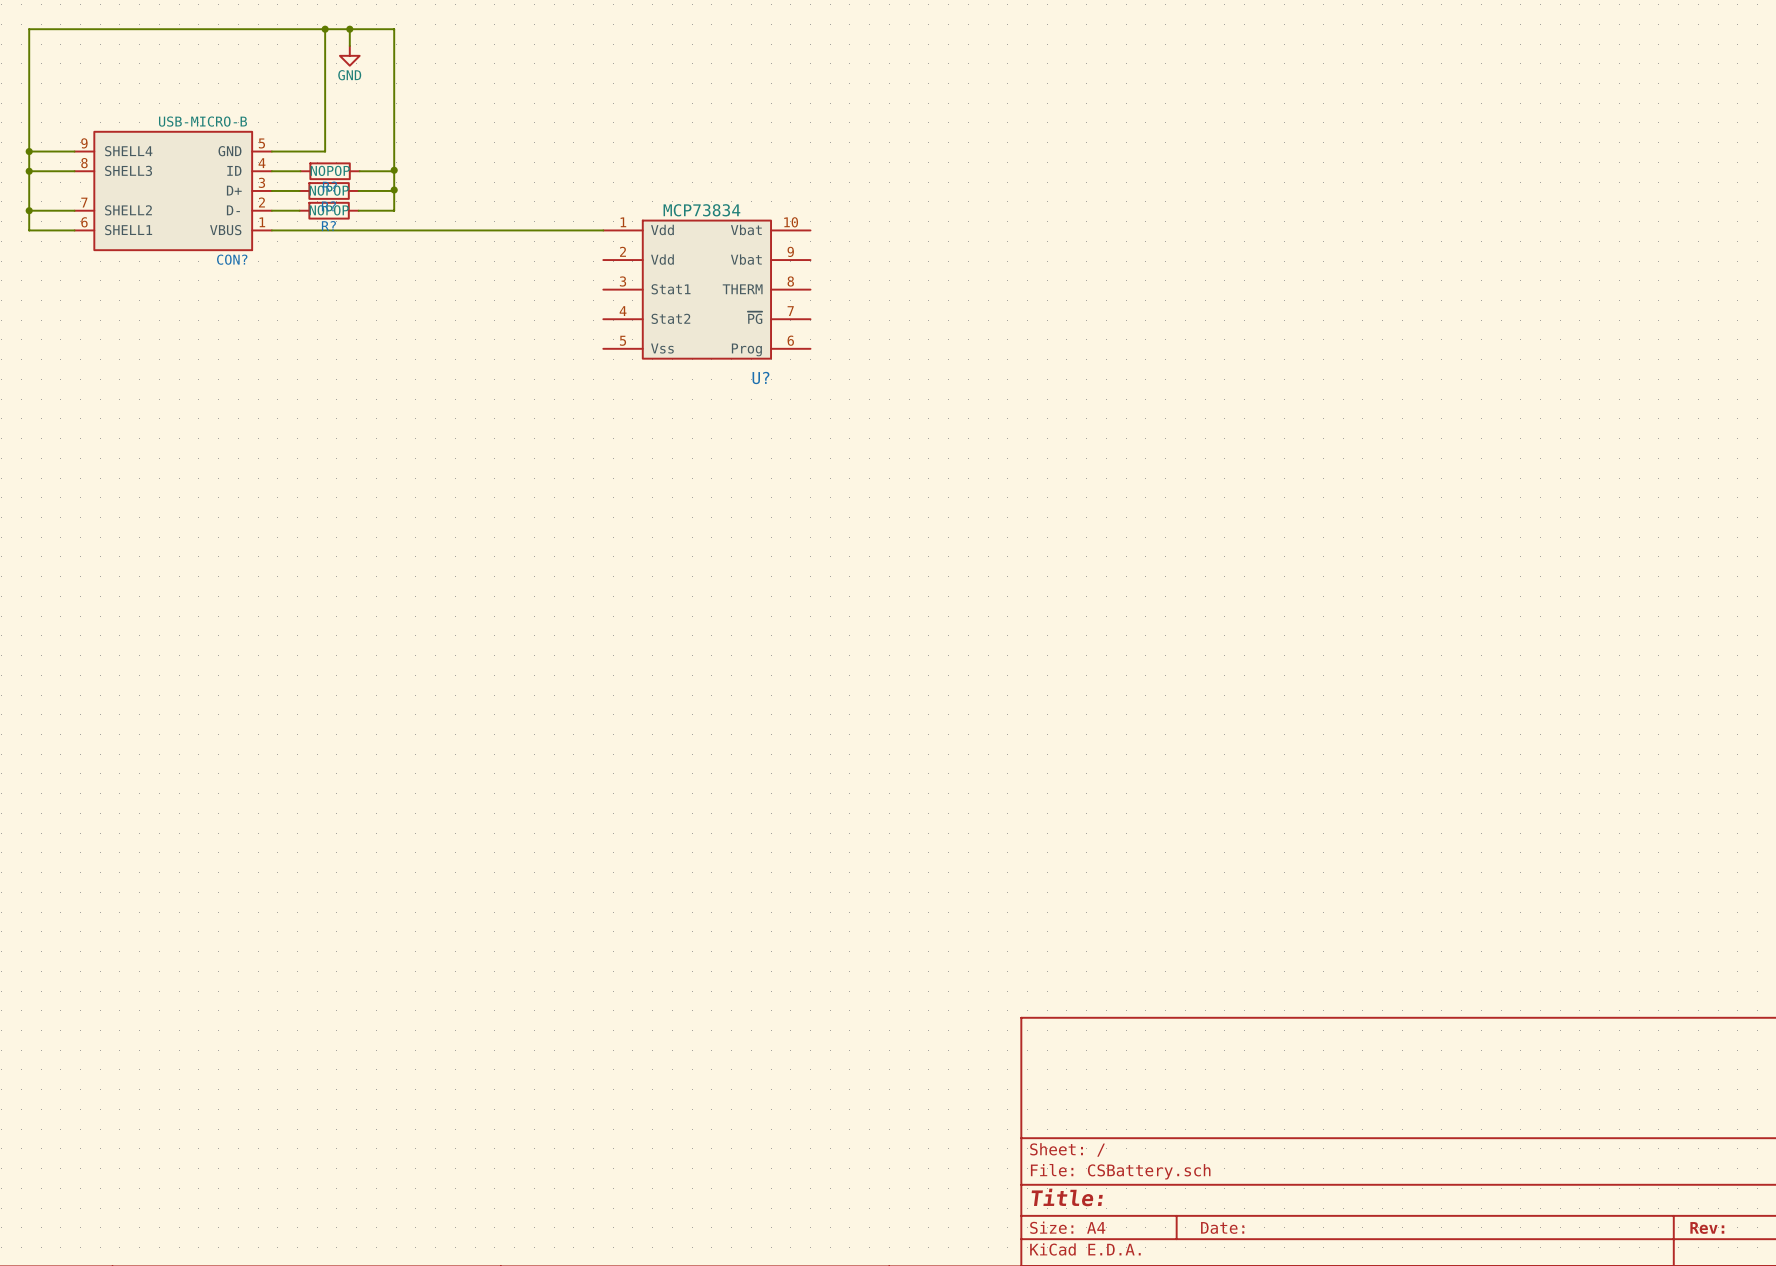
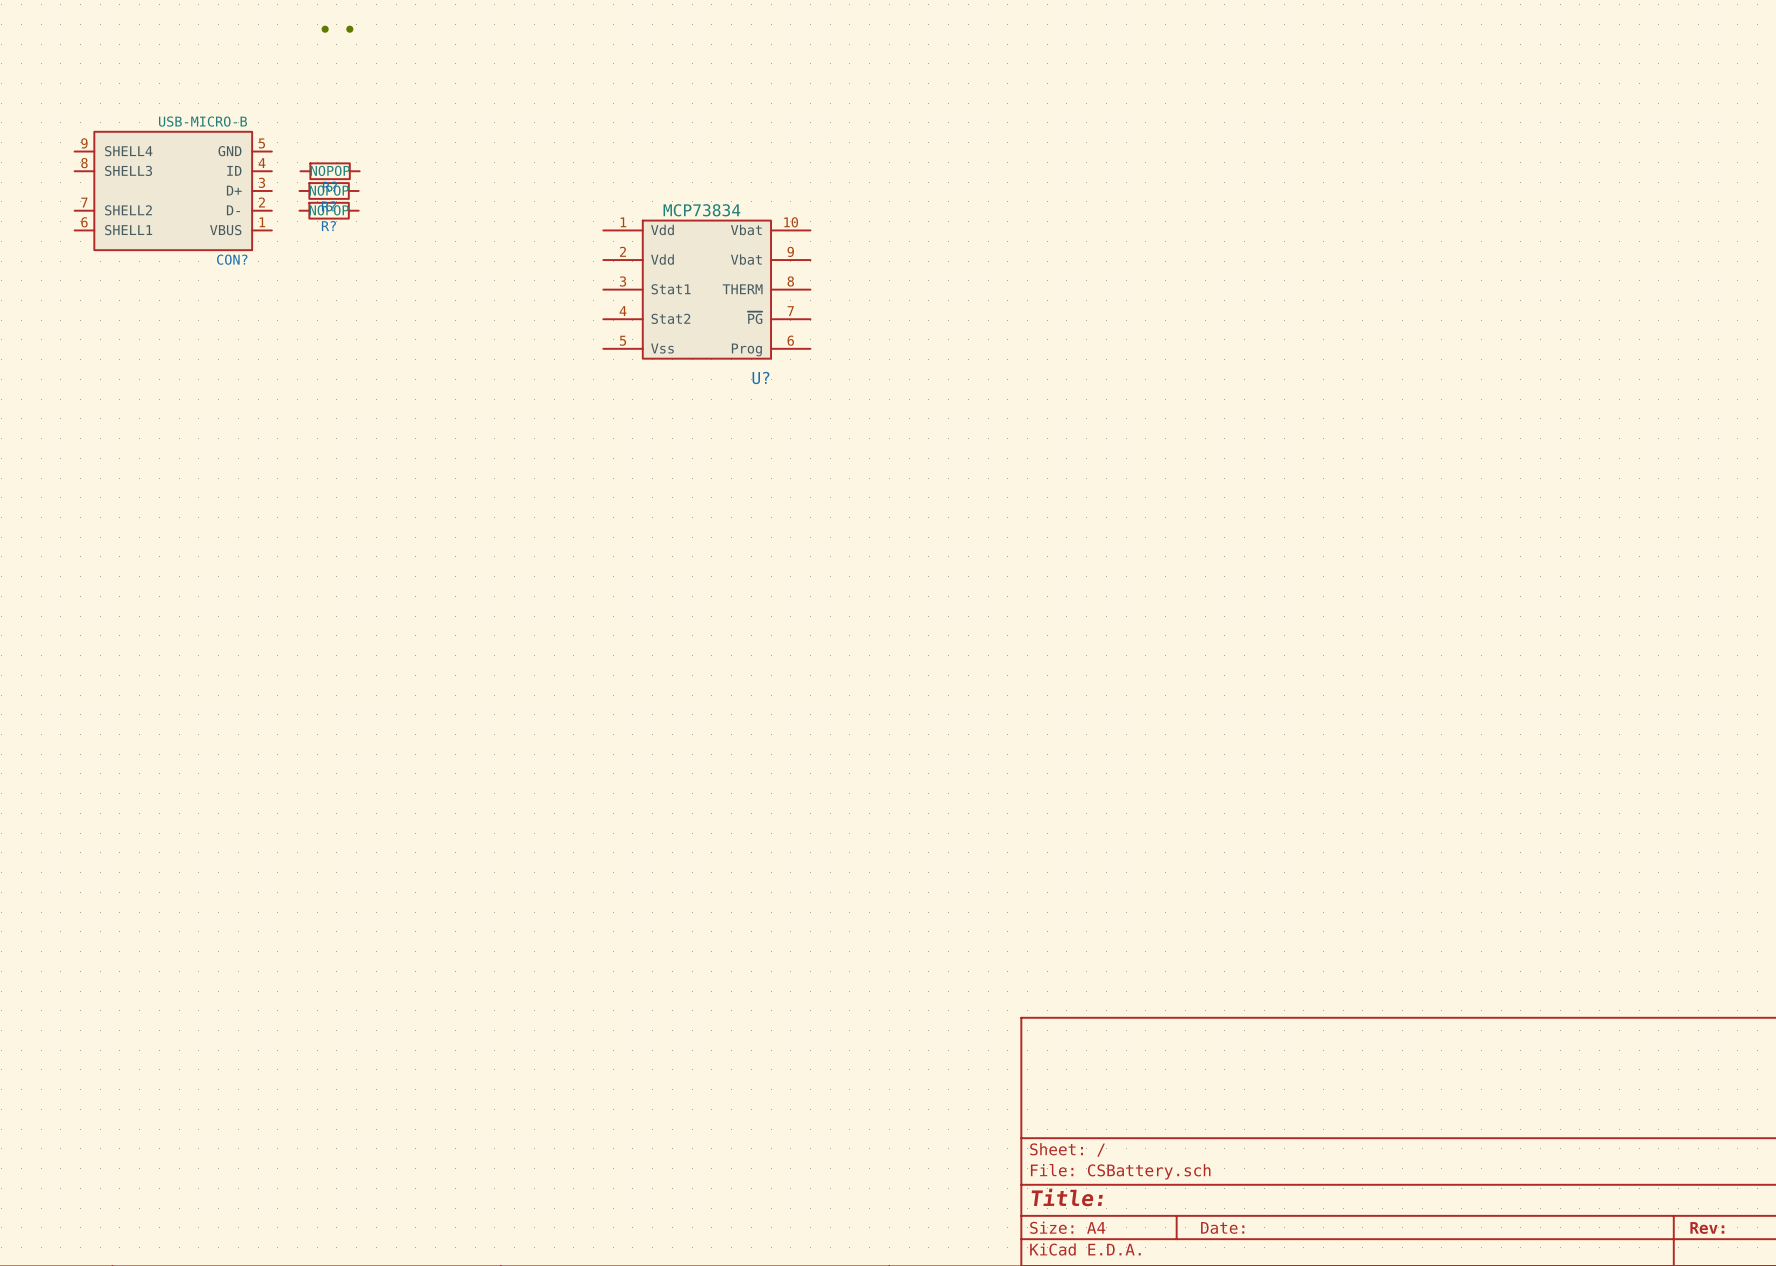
wire: (325, 29) (325, 151) (271, 151) -> none
wire: (349, 29) (349, 45) -> none
power symbol: GND (349, 55) -> none
wire: (29, 151) (74, 151) -> none
junction: (29, 151) -> none
junction: (394, 170) -> none
wire: (29, 171) (74, 171) -> none
junction: (29, 171) -> none
wire: (271, 171) (300, 171) -> none
wire: (359, 171) (394, 171) -> none
wire: (271, 190) (299, 190) -> none
wire: (358, 190) (394, 190) -> none
junction: (394, 190) -> none
wire: (29, 210) (74, 210) -> none
junction: (29, 210) -> none
wire: (271, 210) (299, 210) -> none
wire: (358, 210) (394, 210) (394, 29) (29, 29) (29, 230) (74, 230) -> none
wire: (271, 230) (603, 230) -> none

